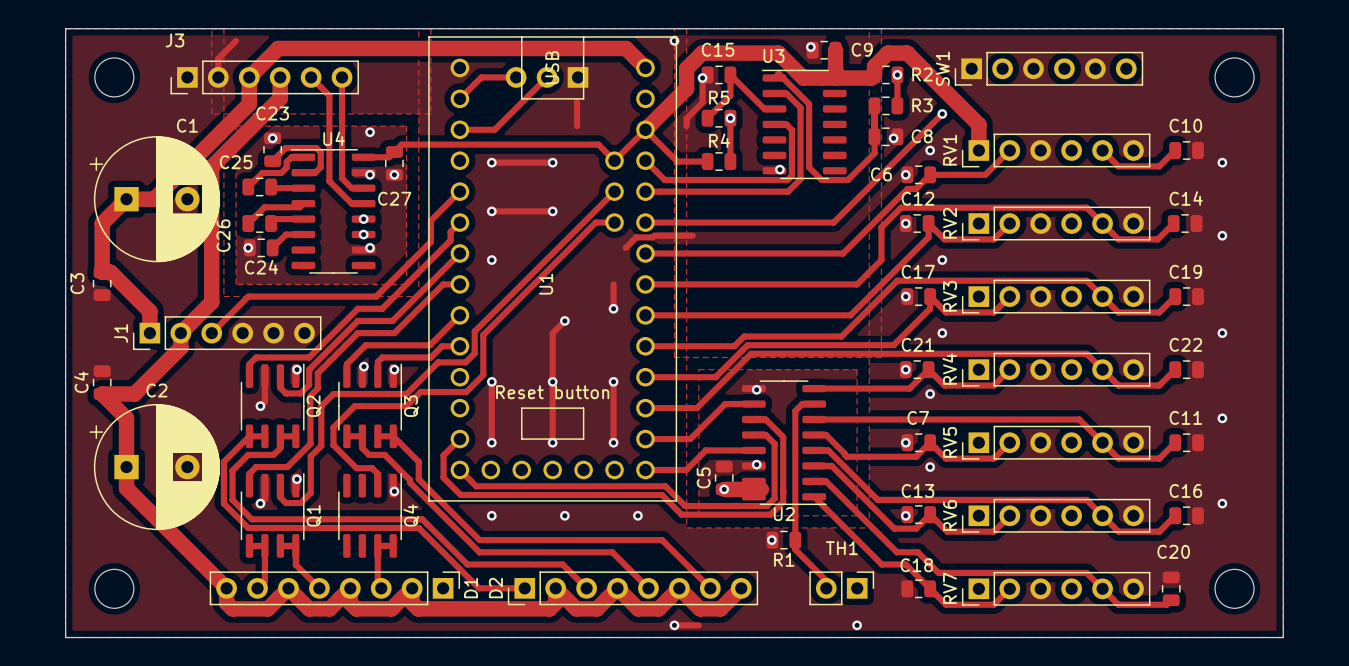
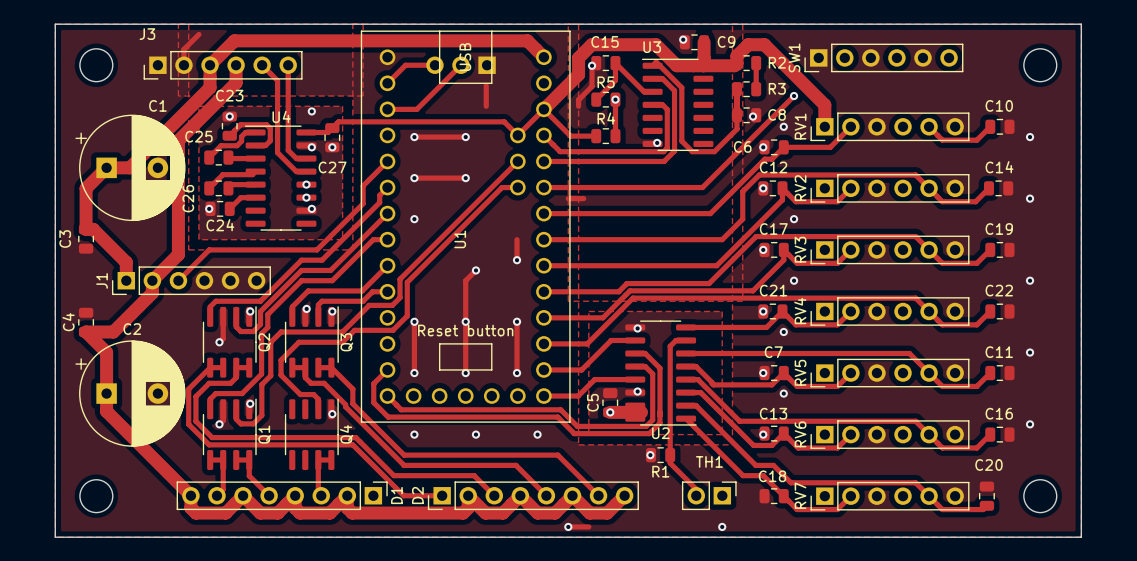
via: (674, 40) -> none
via: (897, 74) -> none
track: (674, 235) (636, 237) (625, 247) -> none

